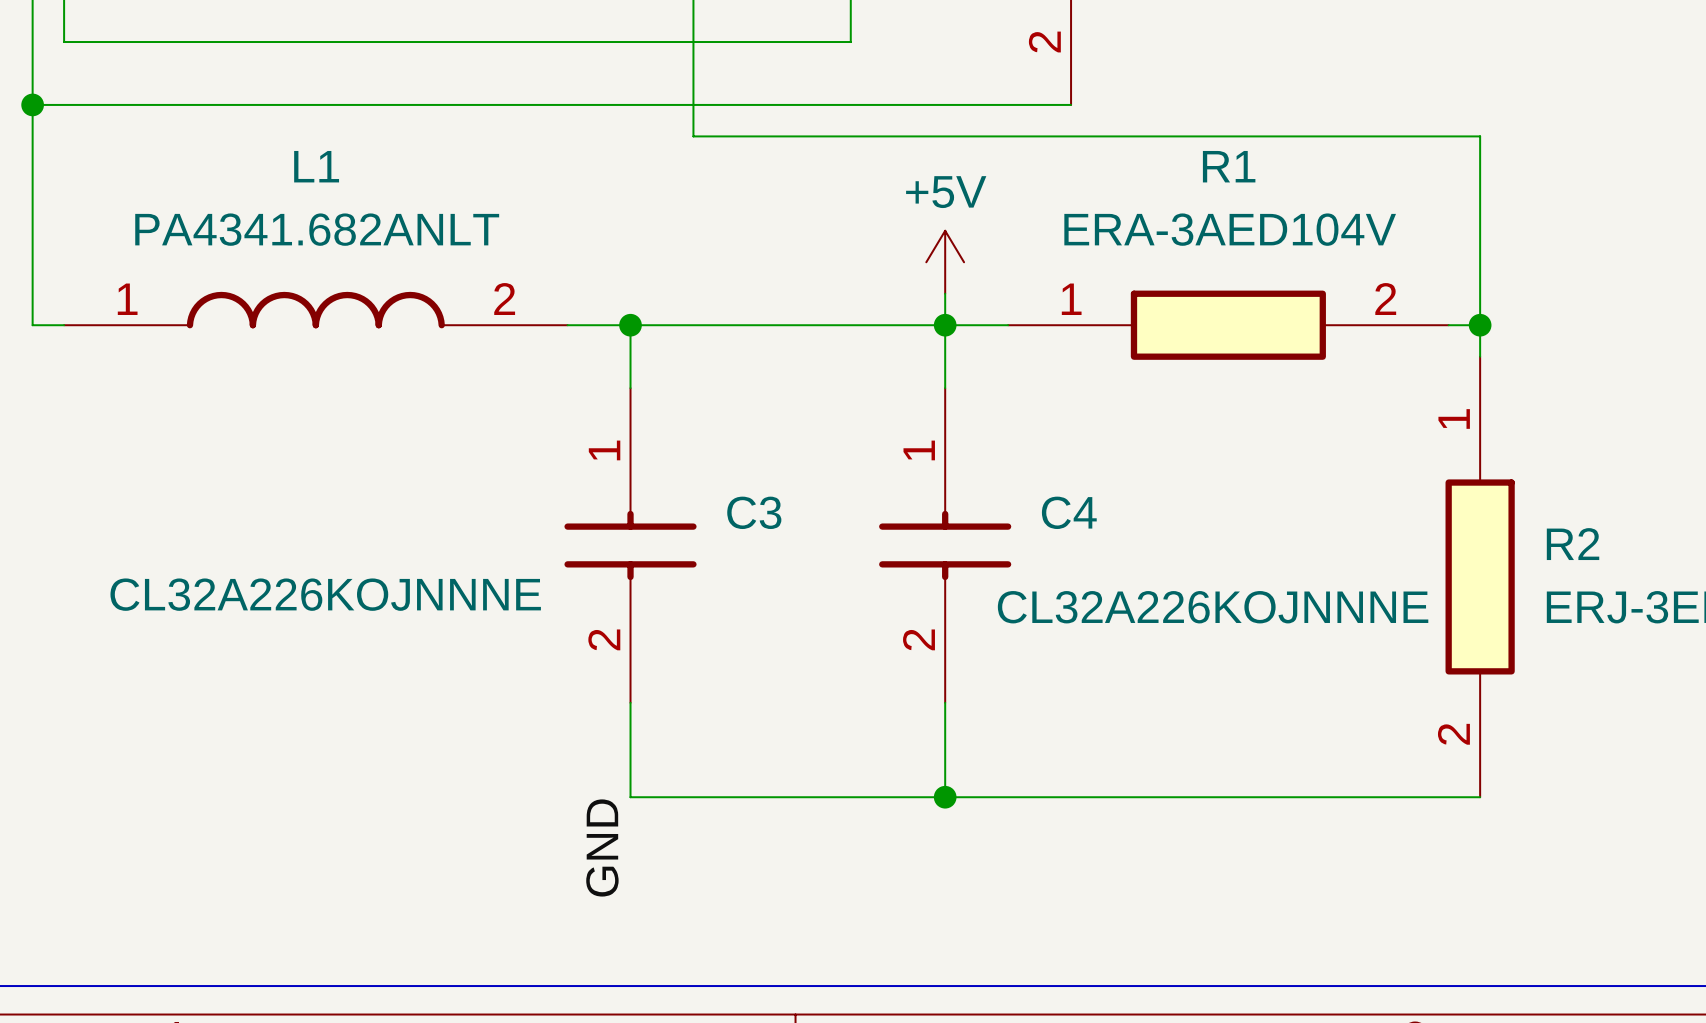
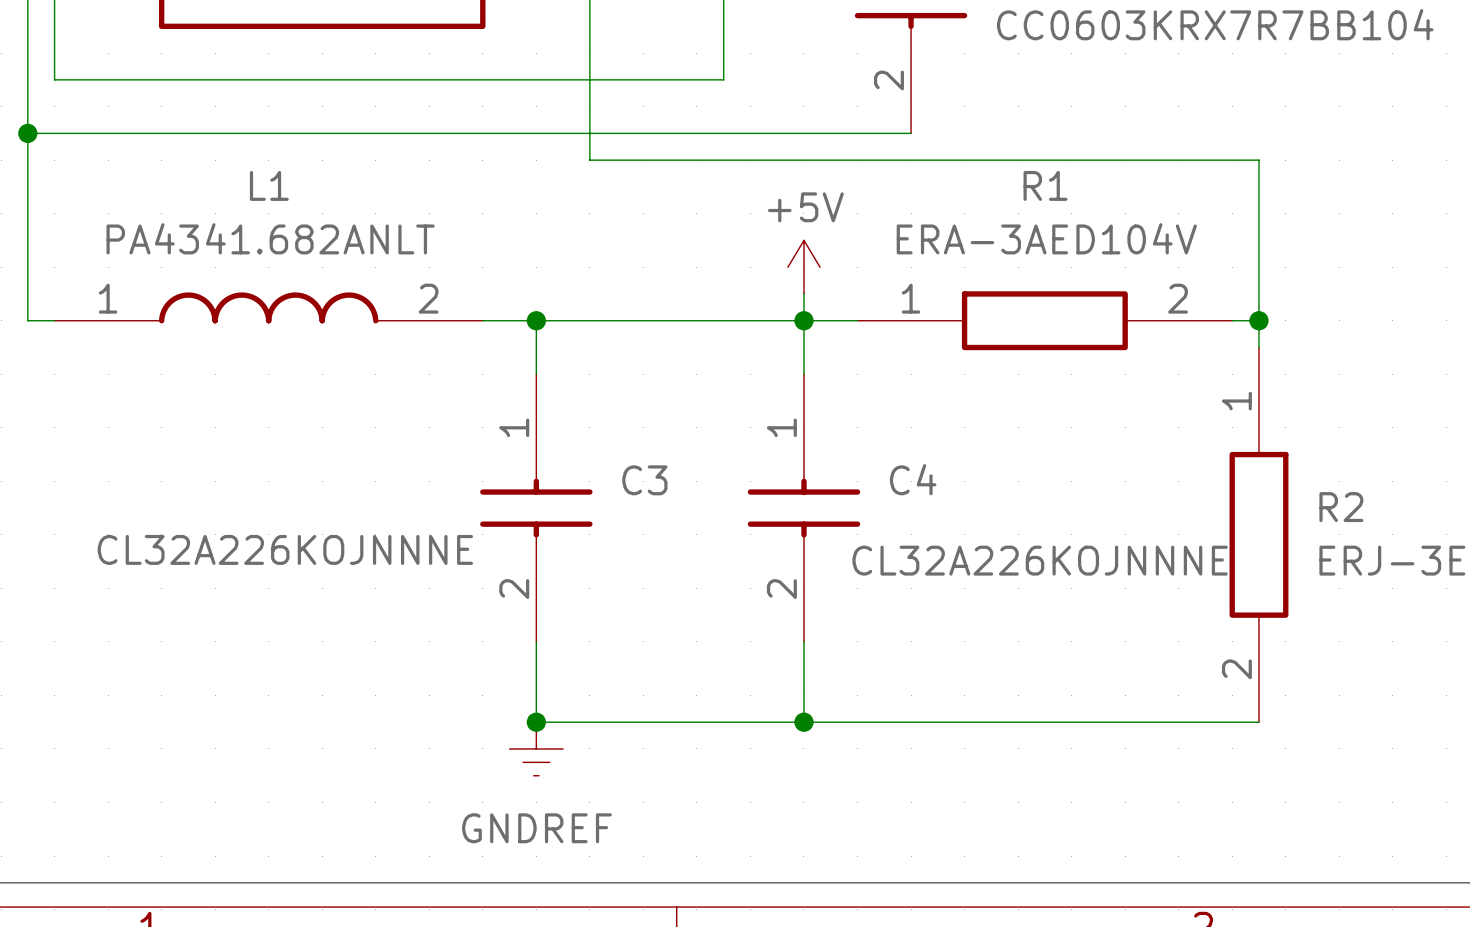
junction: none -> (536, 722)
power symbol: none -> GNDREF (536, 748)
label: GND (602, 847) -> none

